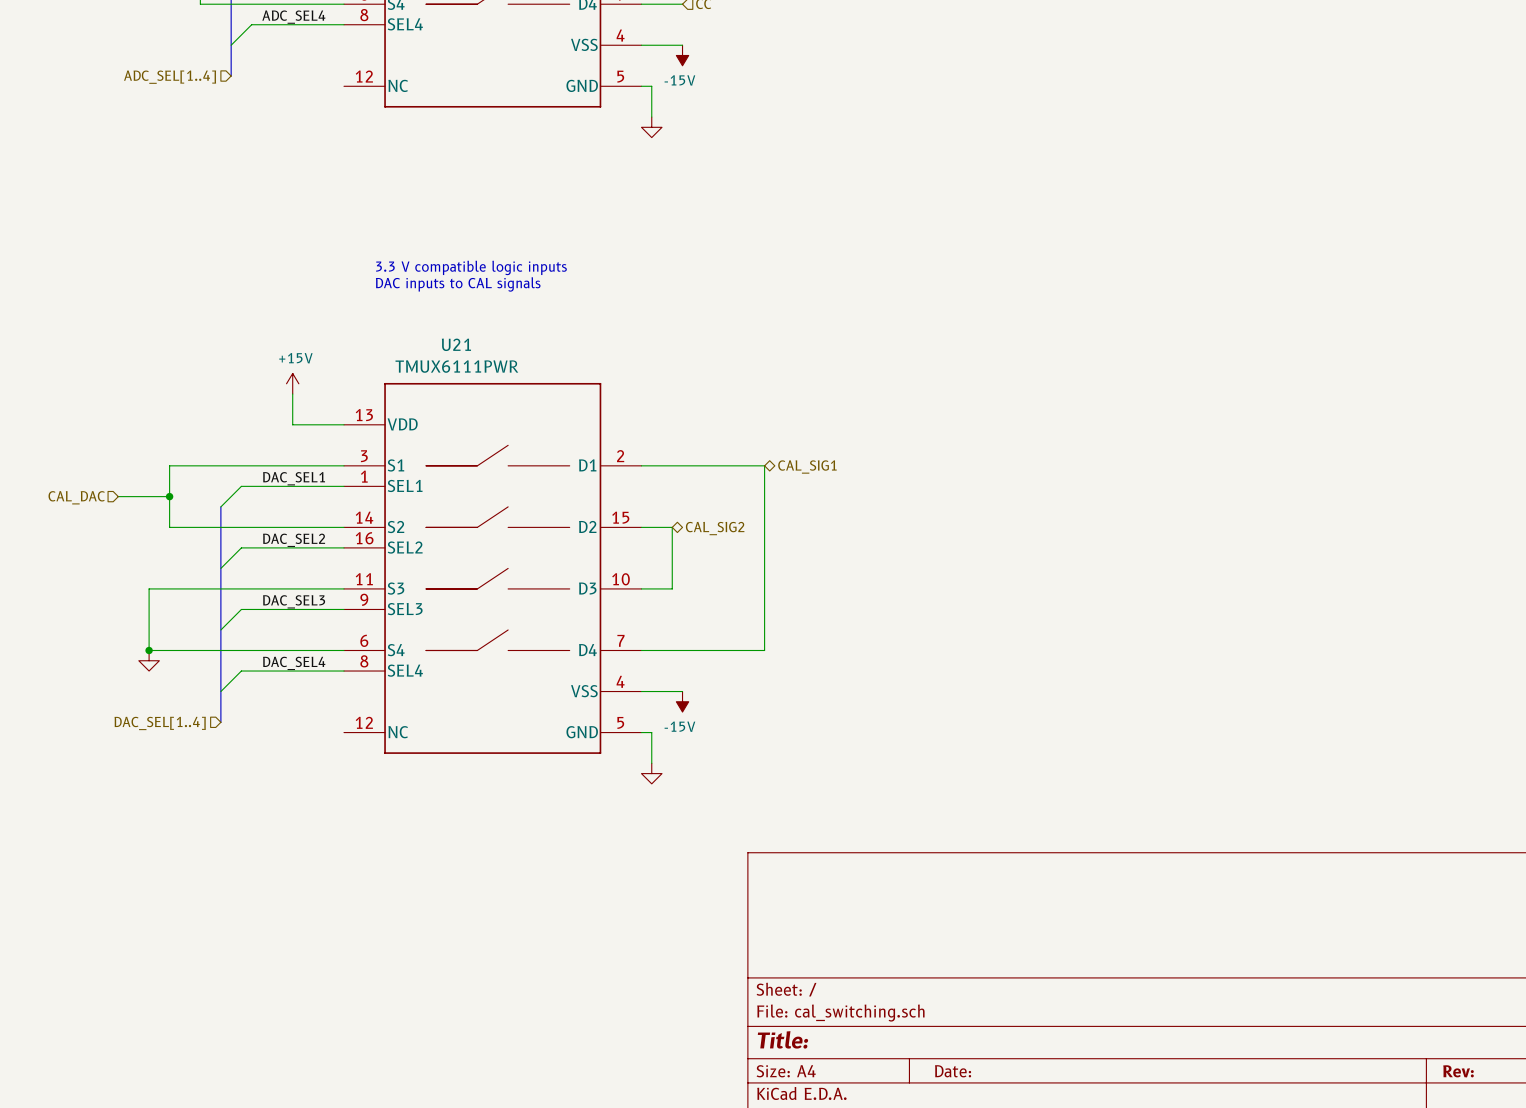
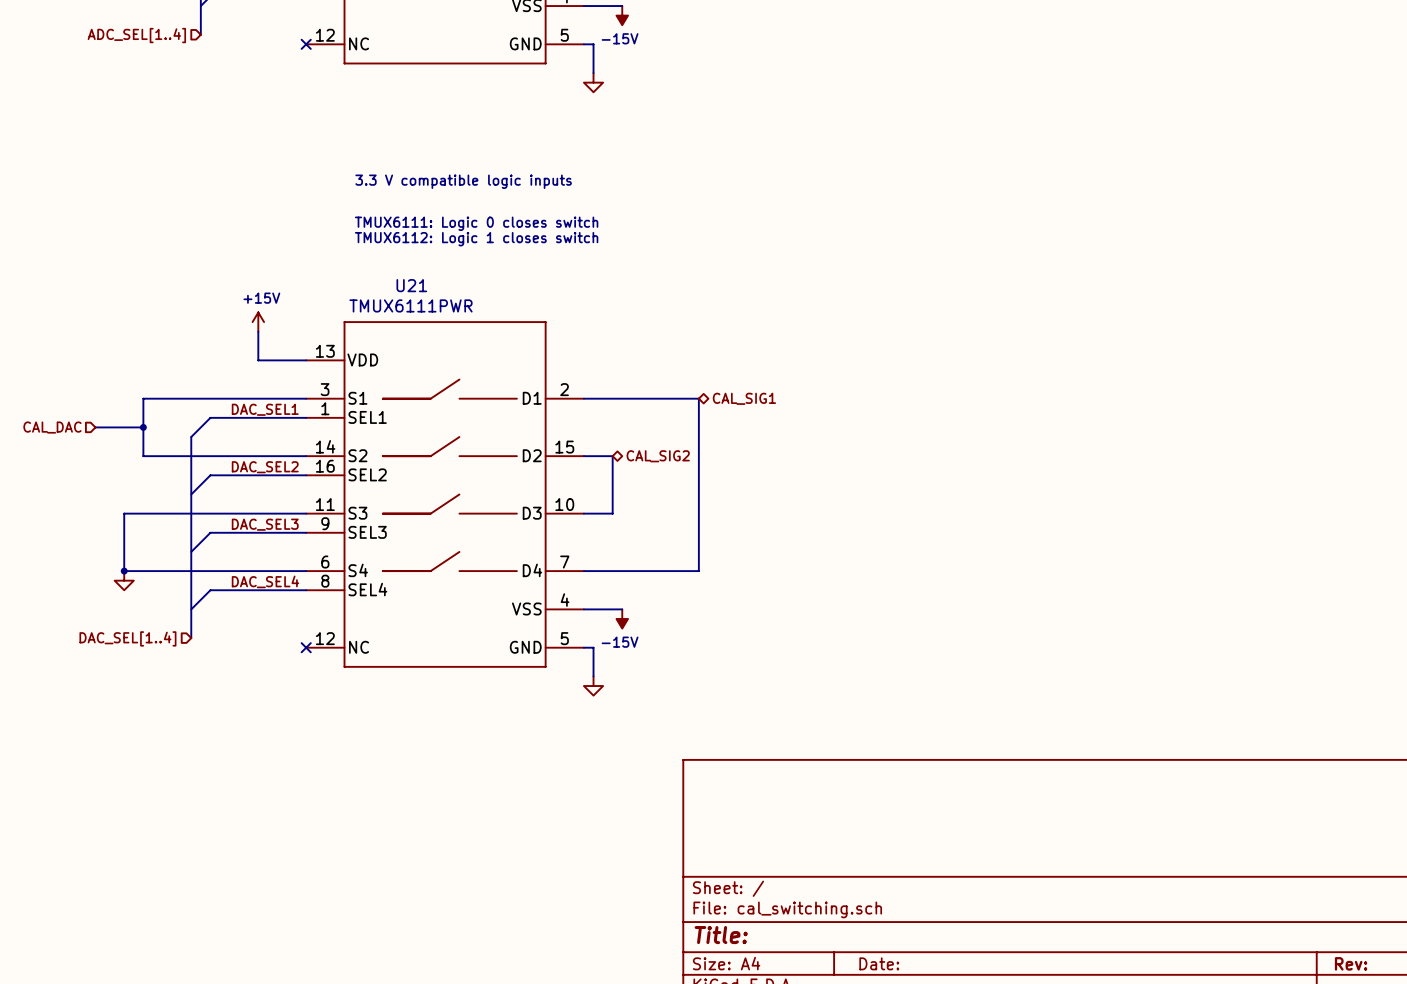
no-connect mark: none -> (306, 44)
text position: 3.3 V compatible logic inputs (471, 267) -> 3.3 V compatible logic inputs (463, 181)
text: none -> TMUX6111: Logic 0 closes switch (476, 223)
text: DAC inputs to CAL signals (458, 284) -> none
text: none -> TMUX6112: Logic 1 closes switch (476, 239)
no-connect mark: none -> (306, 647)

